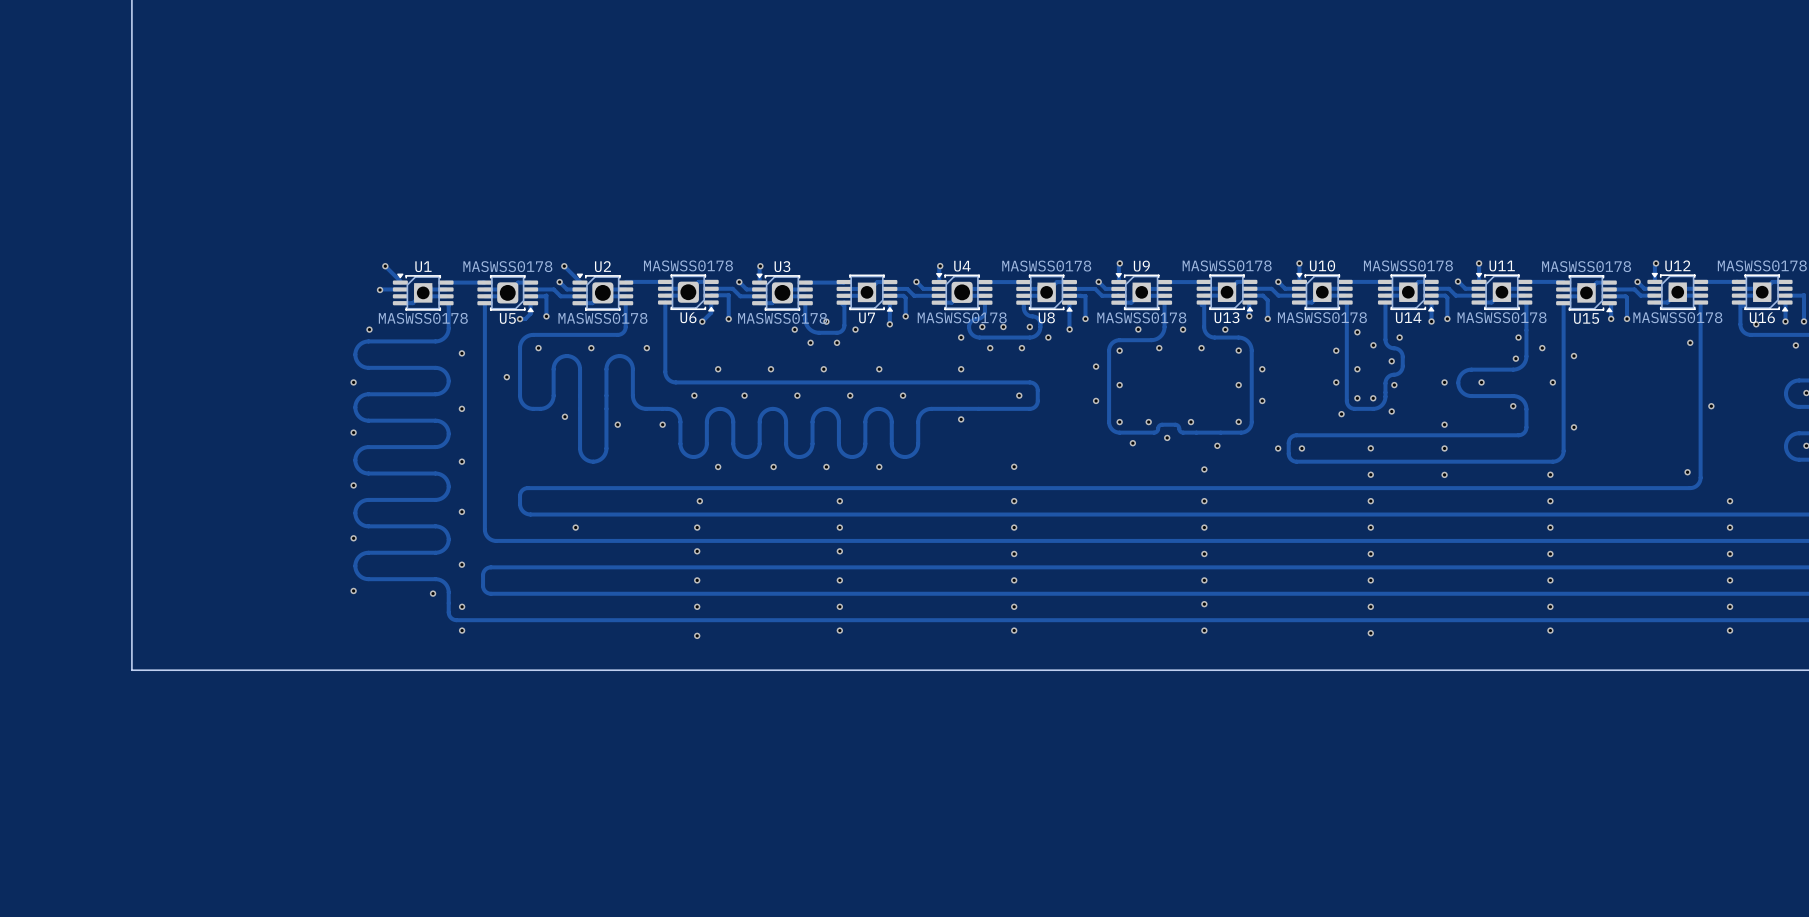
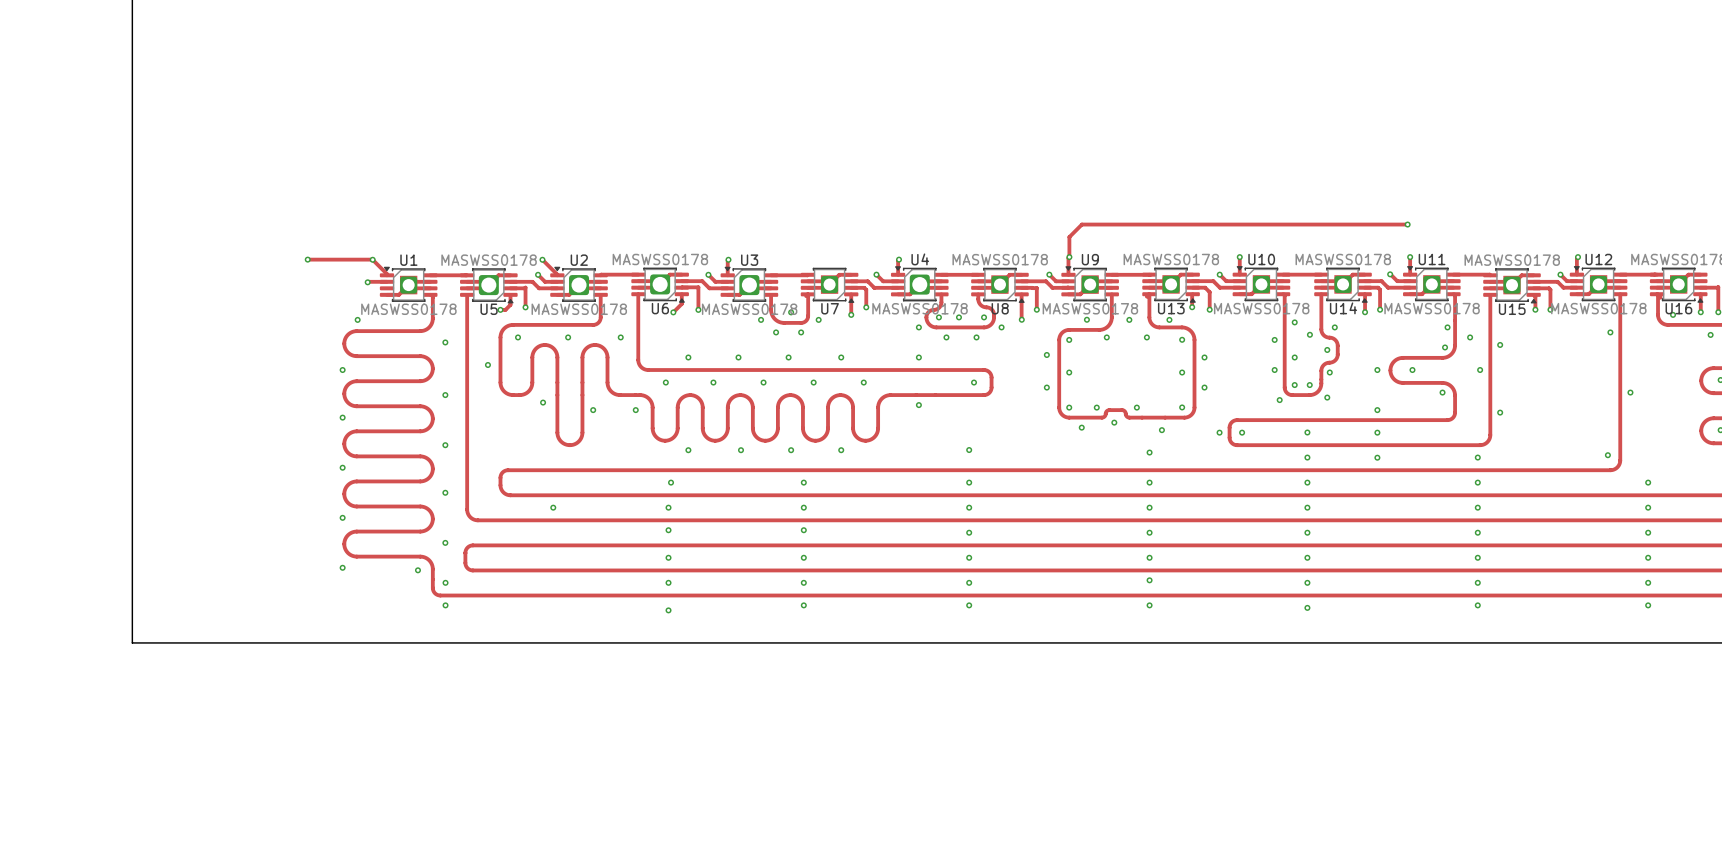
track: none -> (1407, 224) (1081, 224) (1069, 237) (1069, 257)
via: none -> (1407, 224)
track: none -> (307, 259) (372, 259)
via: none -> (307, 259)

